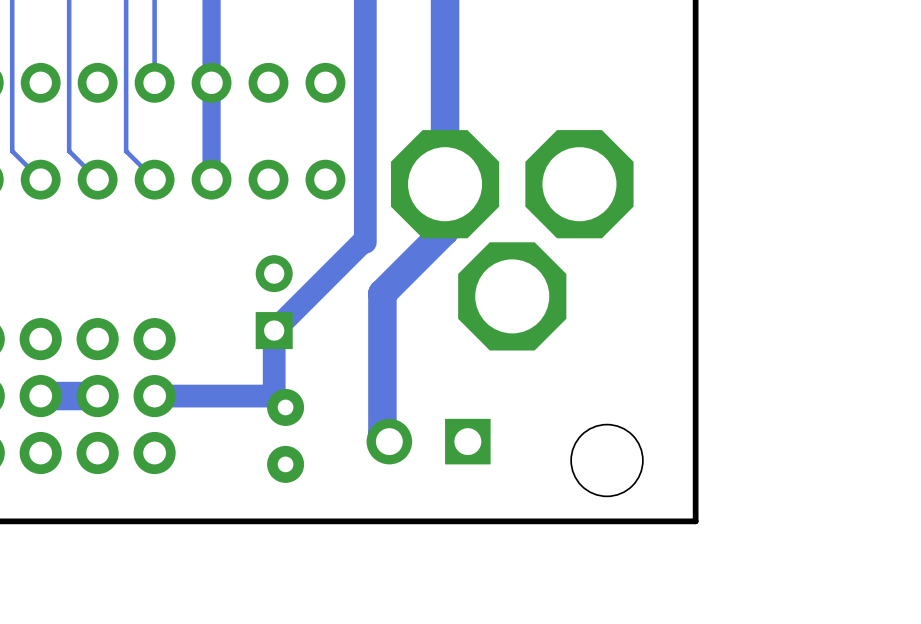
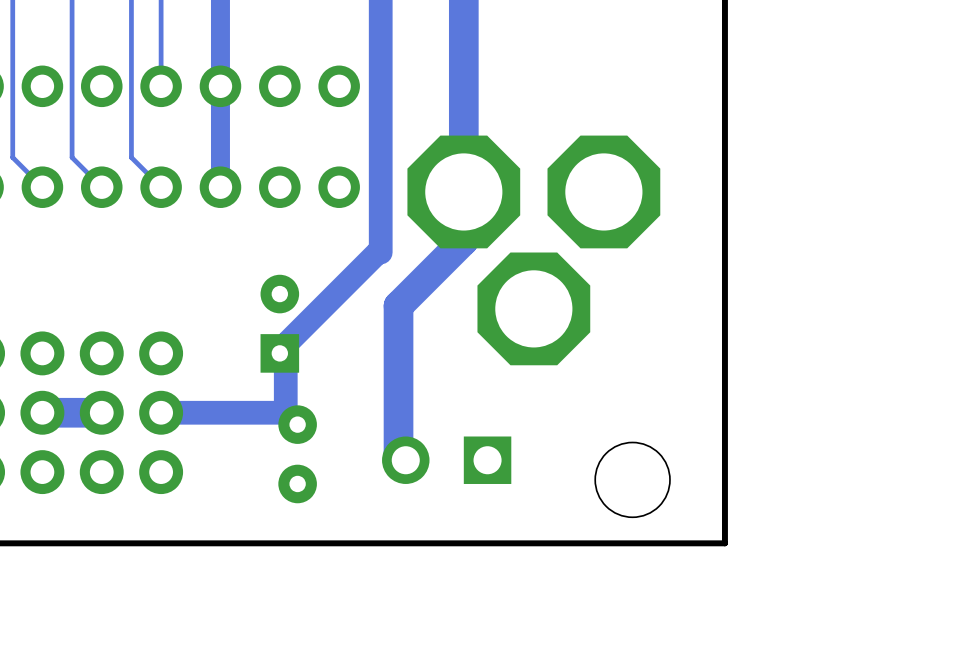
part footprint: [255, 255, 293, 350] -> [260, 274, 300, 373]

